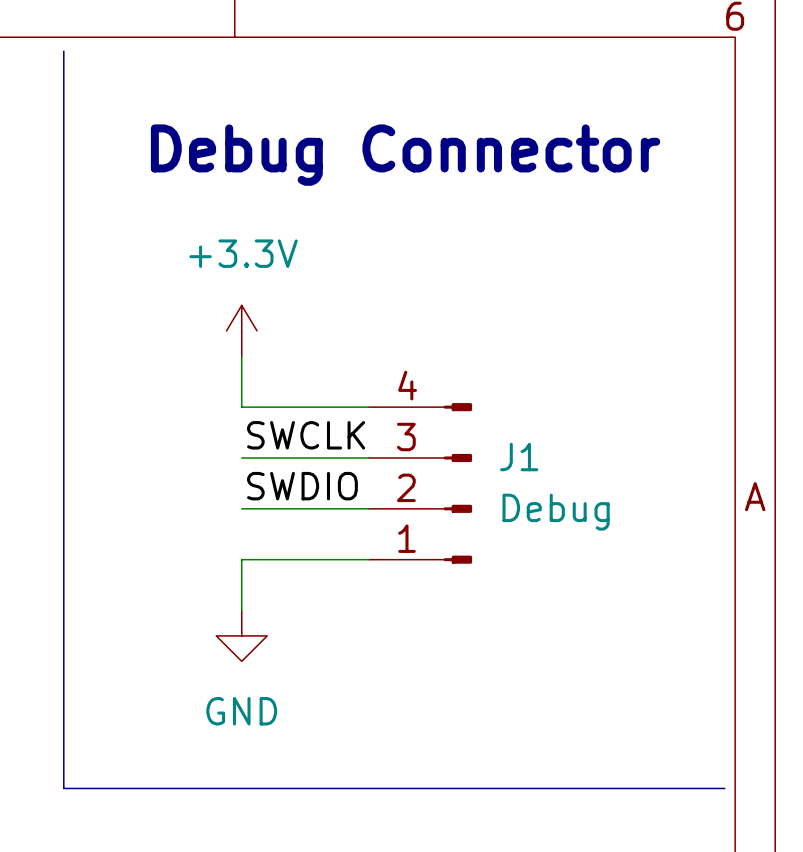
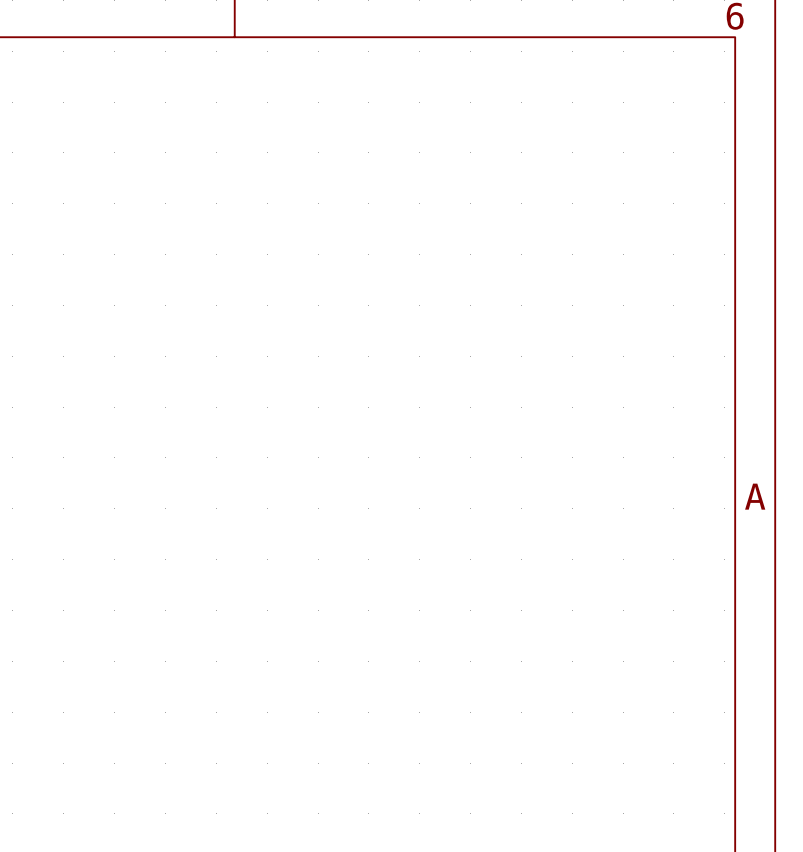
line: (63, 51) (63, 788) (724, 788) -> none
text: Debug Connector (405, 155) -> none
power symbol: +3.3V (241, 330) -> none
wire: (241, 356) (241, 407) (368, 407) -> none
label: SWCLK (306, 435) -> none
wire: (241, 457) (368, 457) -> none
J1: Debug (420, 483) -> none
label: SWDIO (302, 486) -> none
wire: (241, 508) (368, 508) -> none
wire: (368, 559) (241, 559) (241, 610) -> none
power symbol: GND (241, 635) -> none

